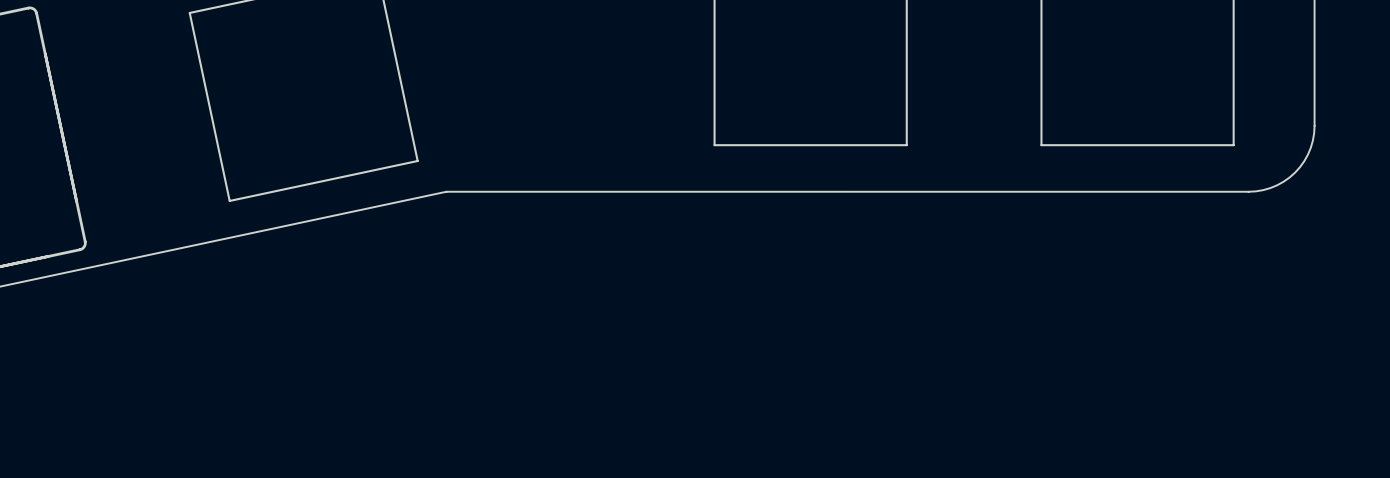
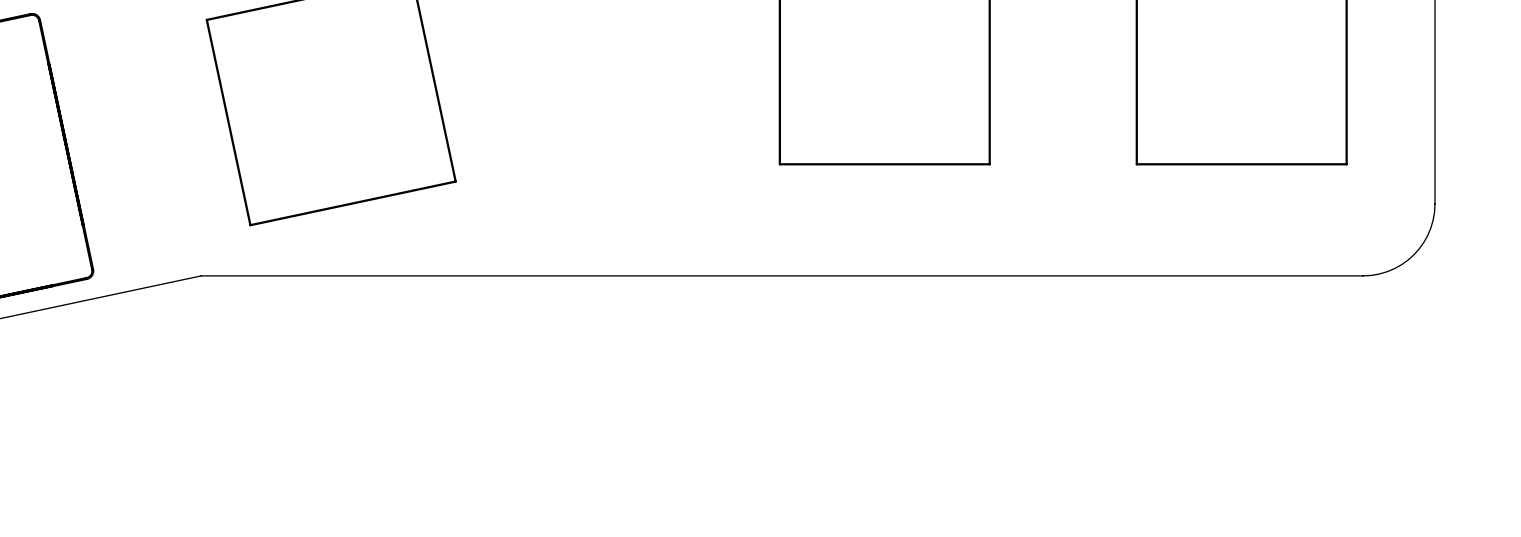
board edge: (1314, 125) (1310, 147) (1300, 166) (1283, 181) (1270, 188) (1256, 191) (446, 191) (184, 247) -> (1435, 143) (1434, 212) (1427, 235) (1413, 254) (1401, 264) (1386, 271) (1371, 275) (201, 275)

